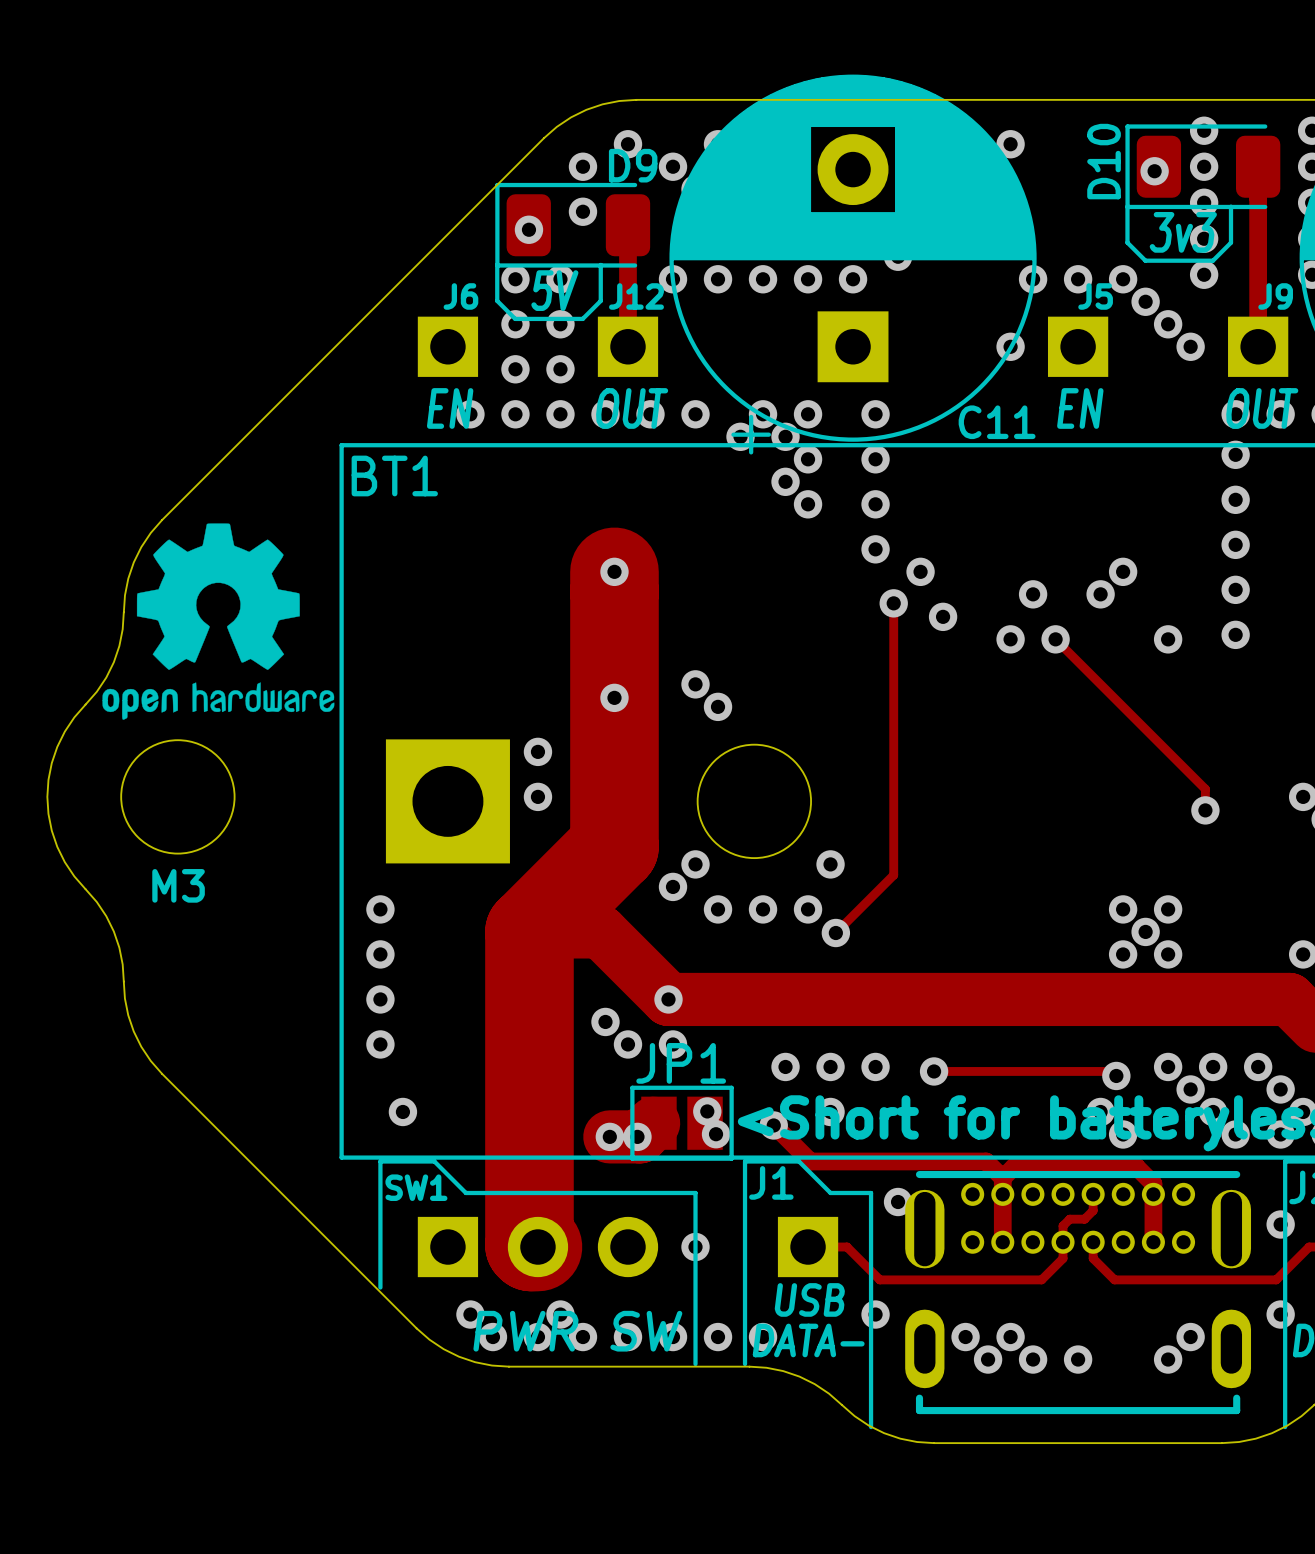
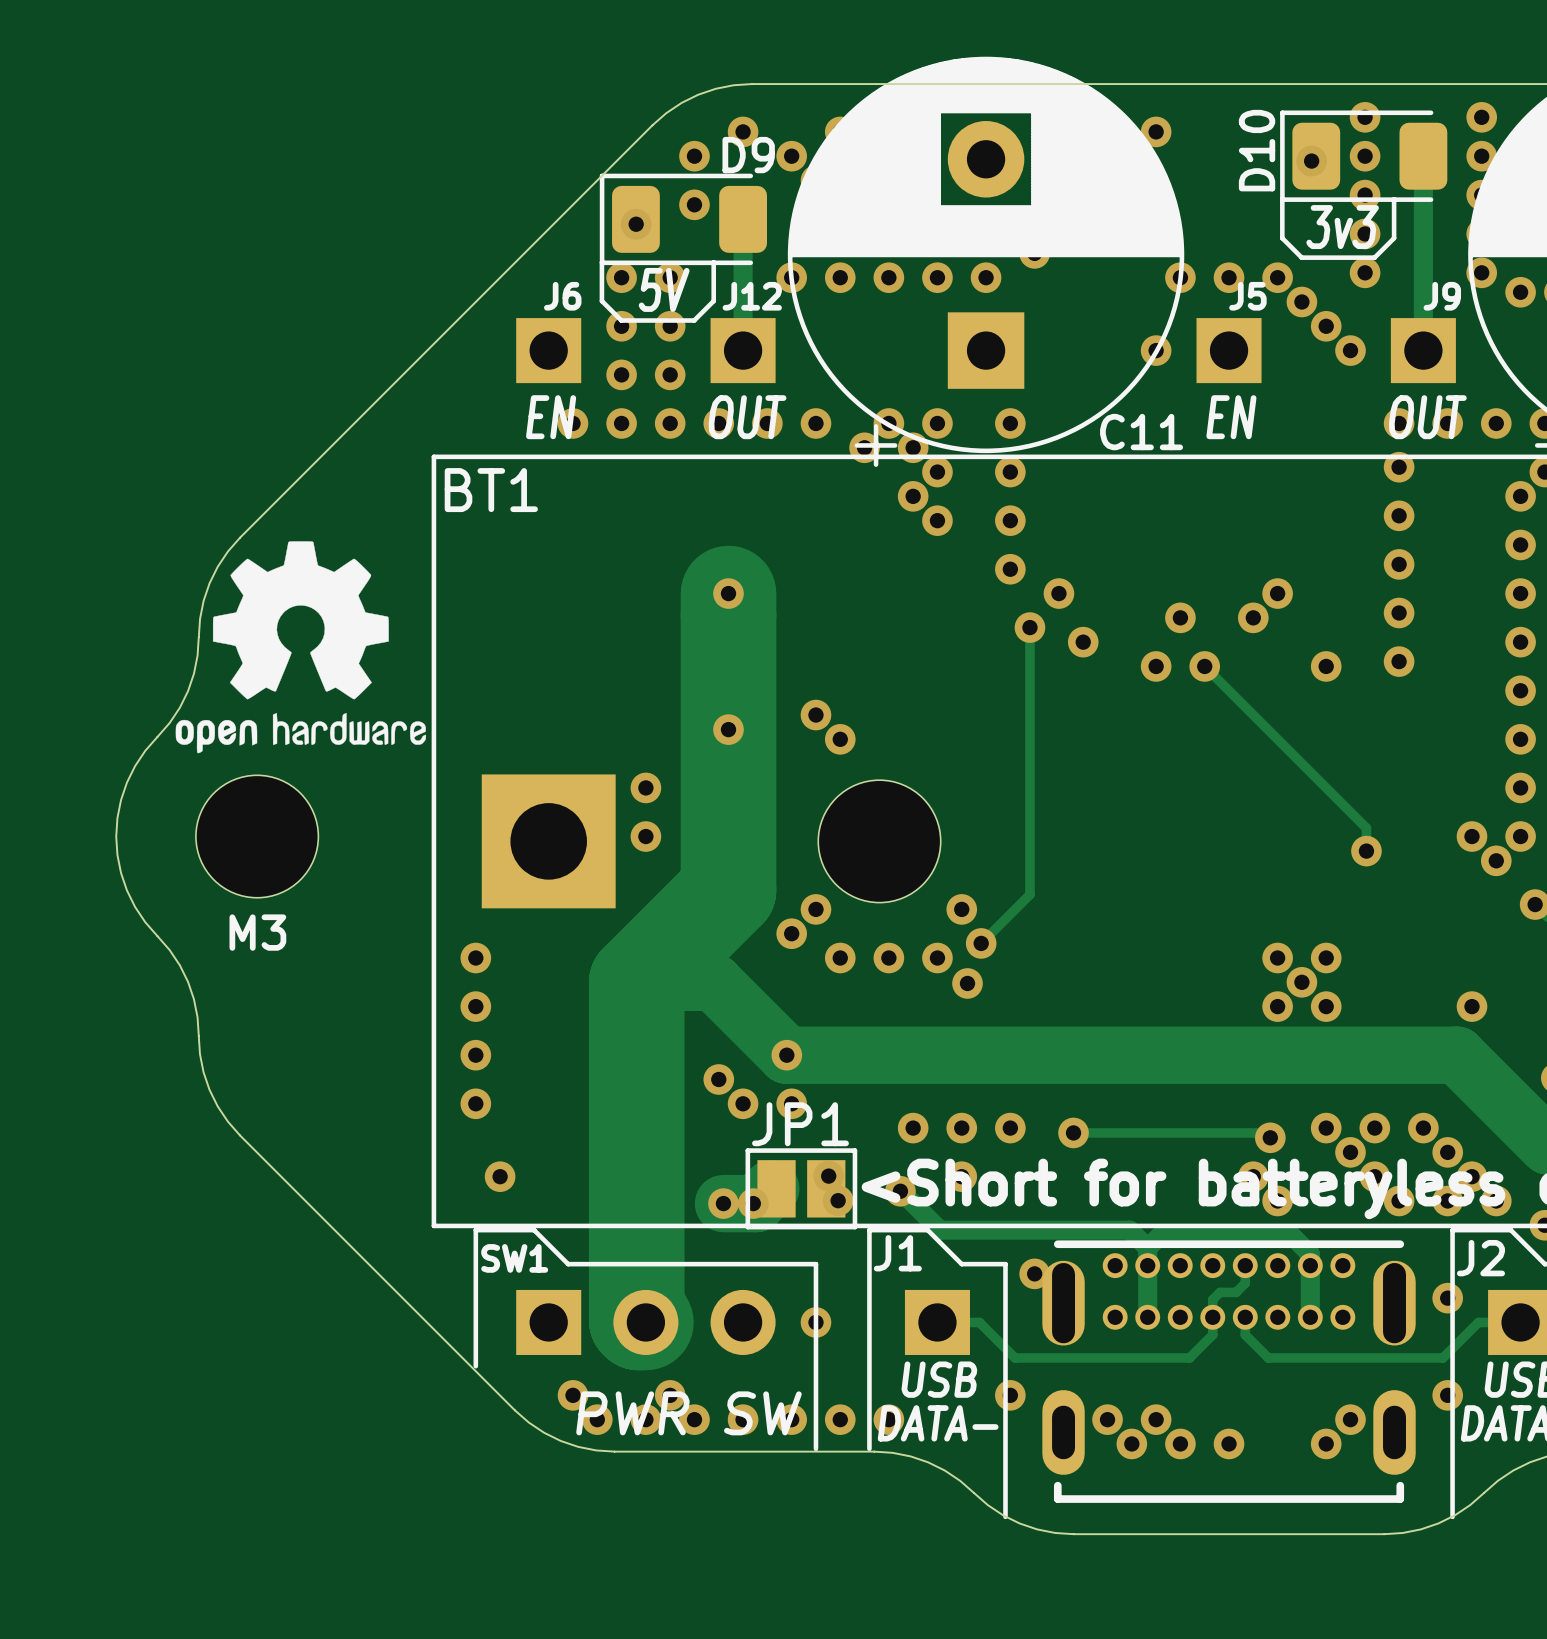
track: (893, 850) (893, 875) (835, 933) -> (1029, 894) (981, 943)
via: none -> (981, 943)

